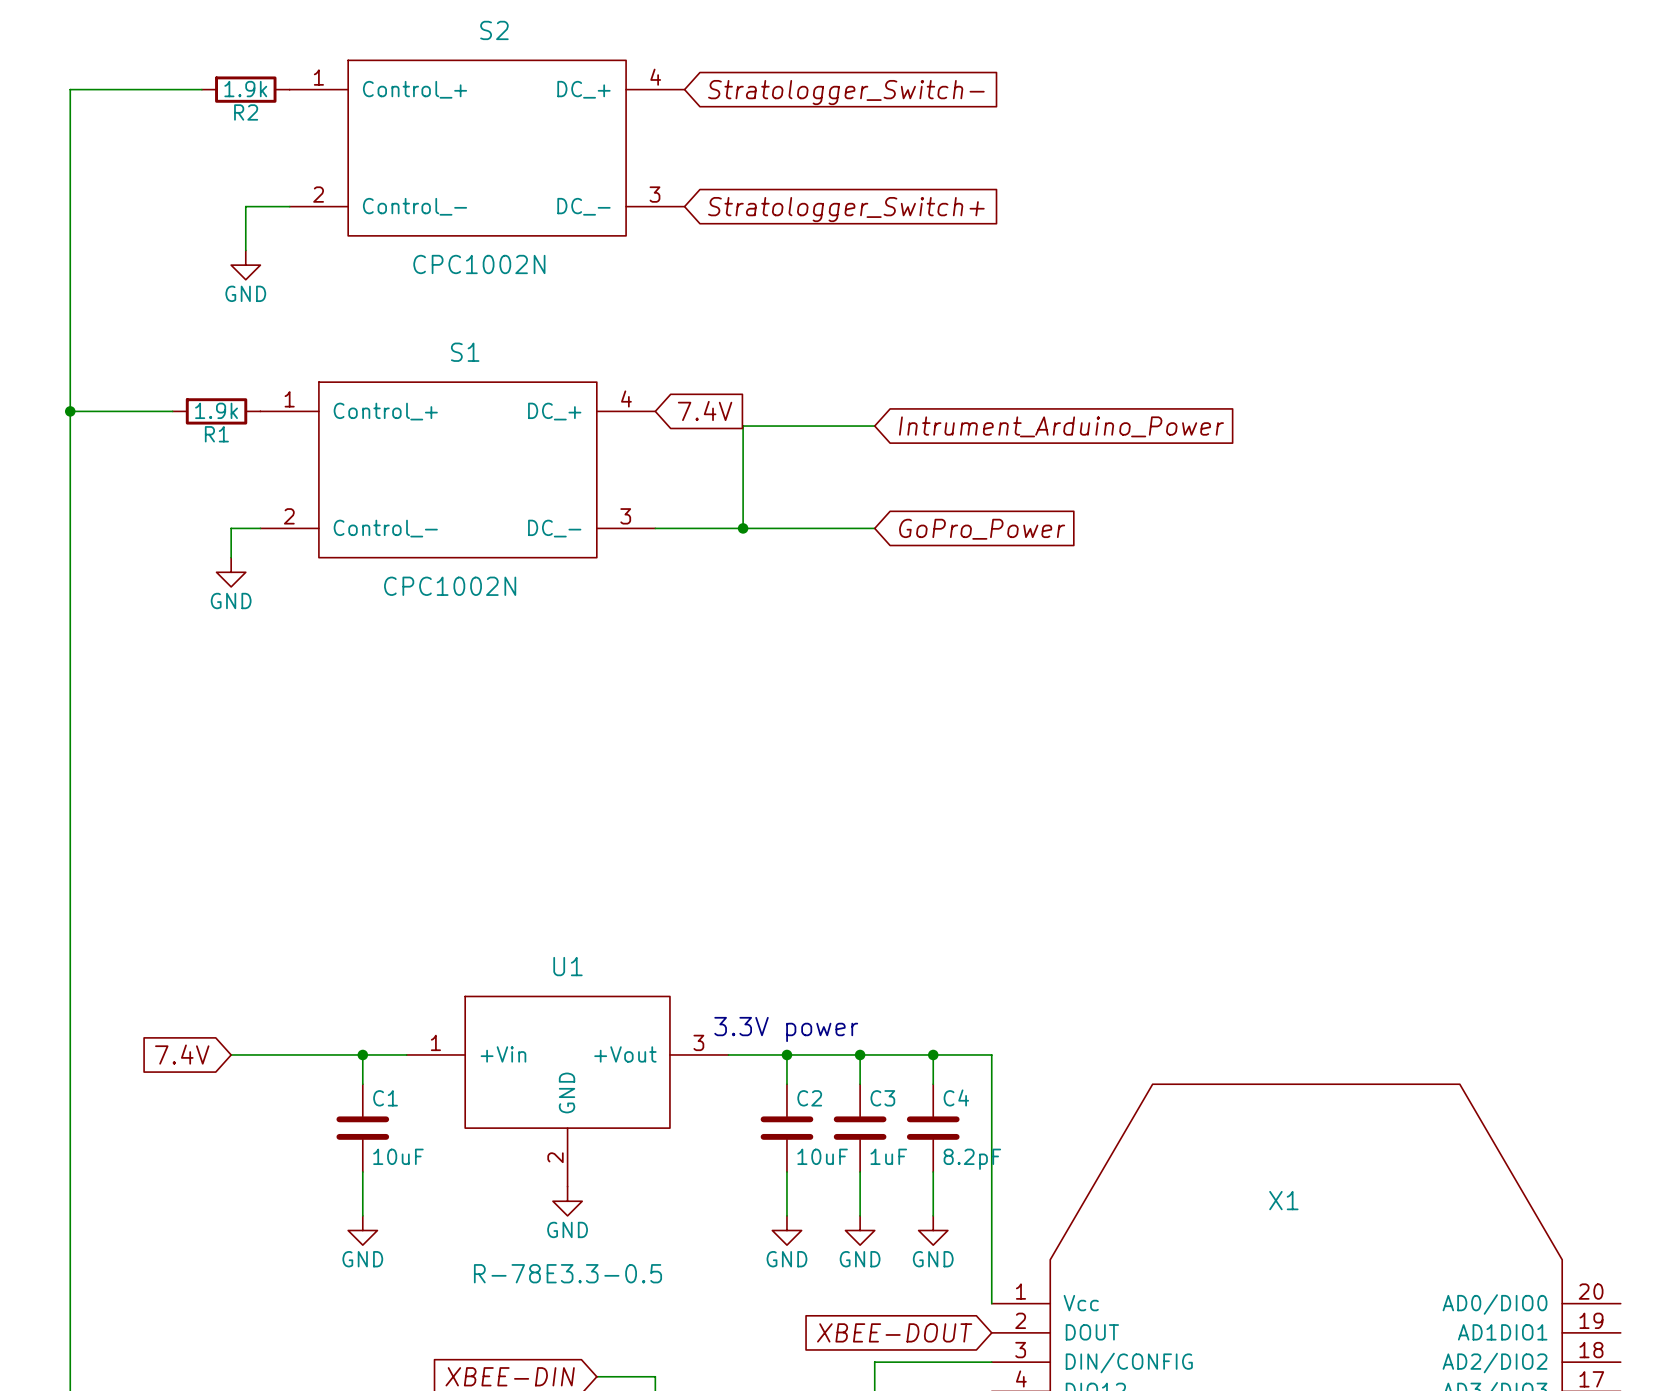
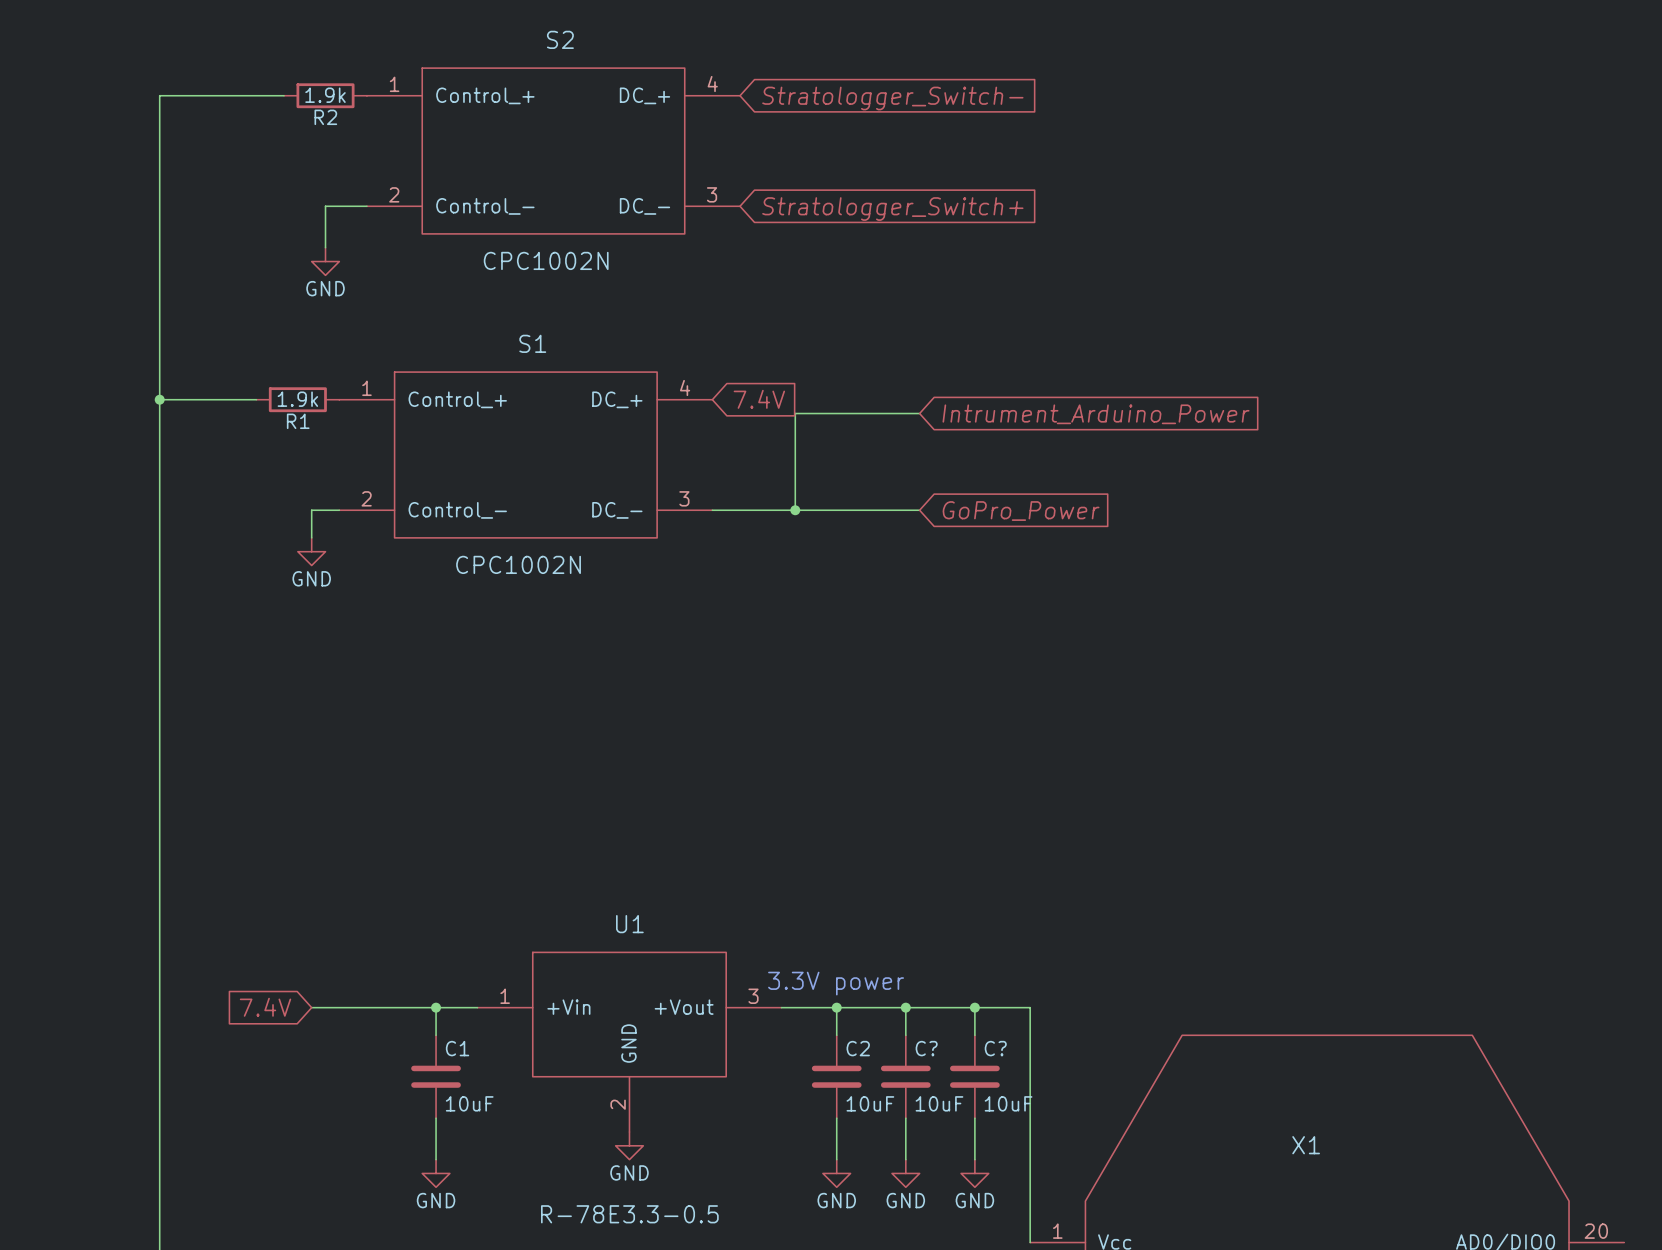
C4 name: C4 (956, 1097) -> C? (995, 1048)
C3 name: C3 (882, 1098) -> C? (926, 1048)
C3 value: 1uF (888, 1156) -> 10uF (939, 1103)
C4 value: 8.2pF (972, 1159) -> 10uF (1008, 1103)

